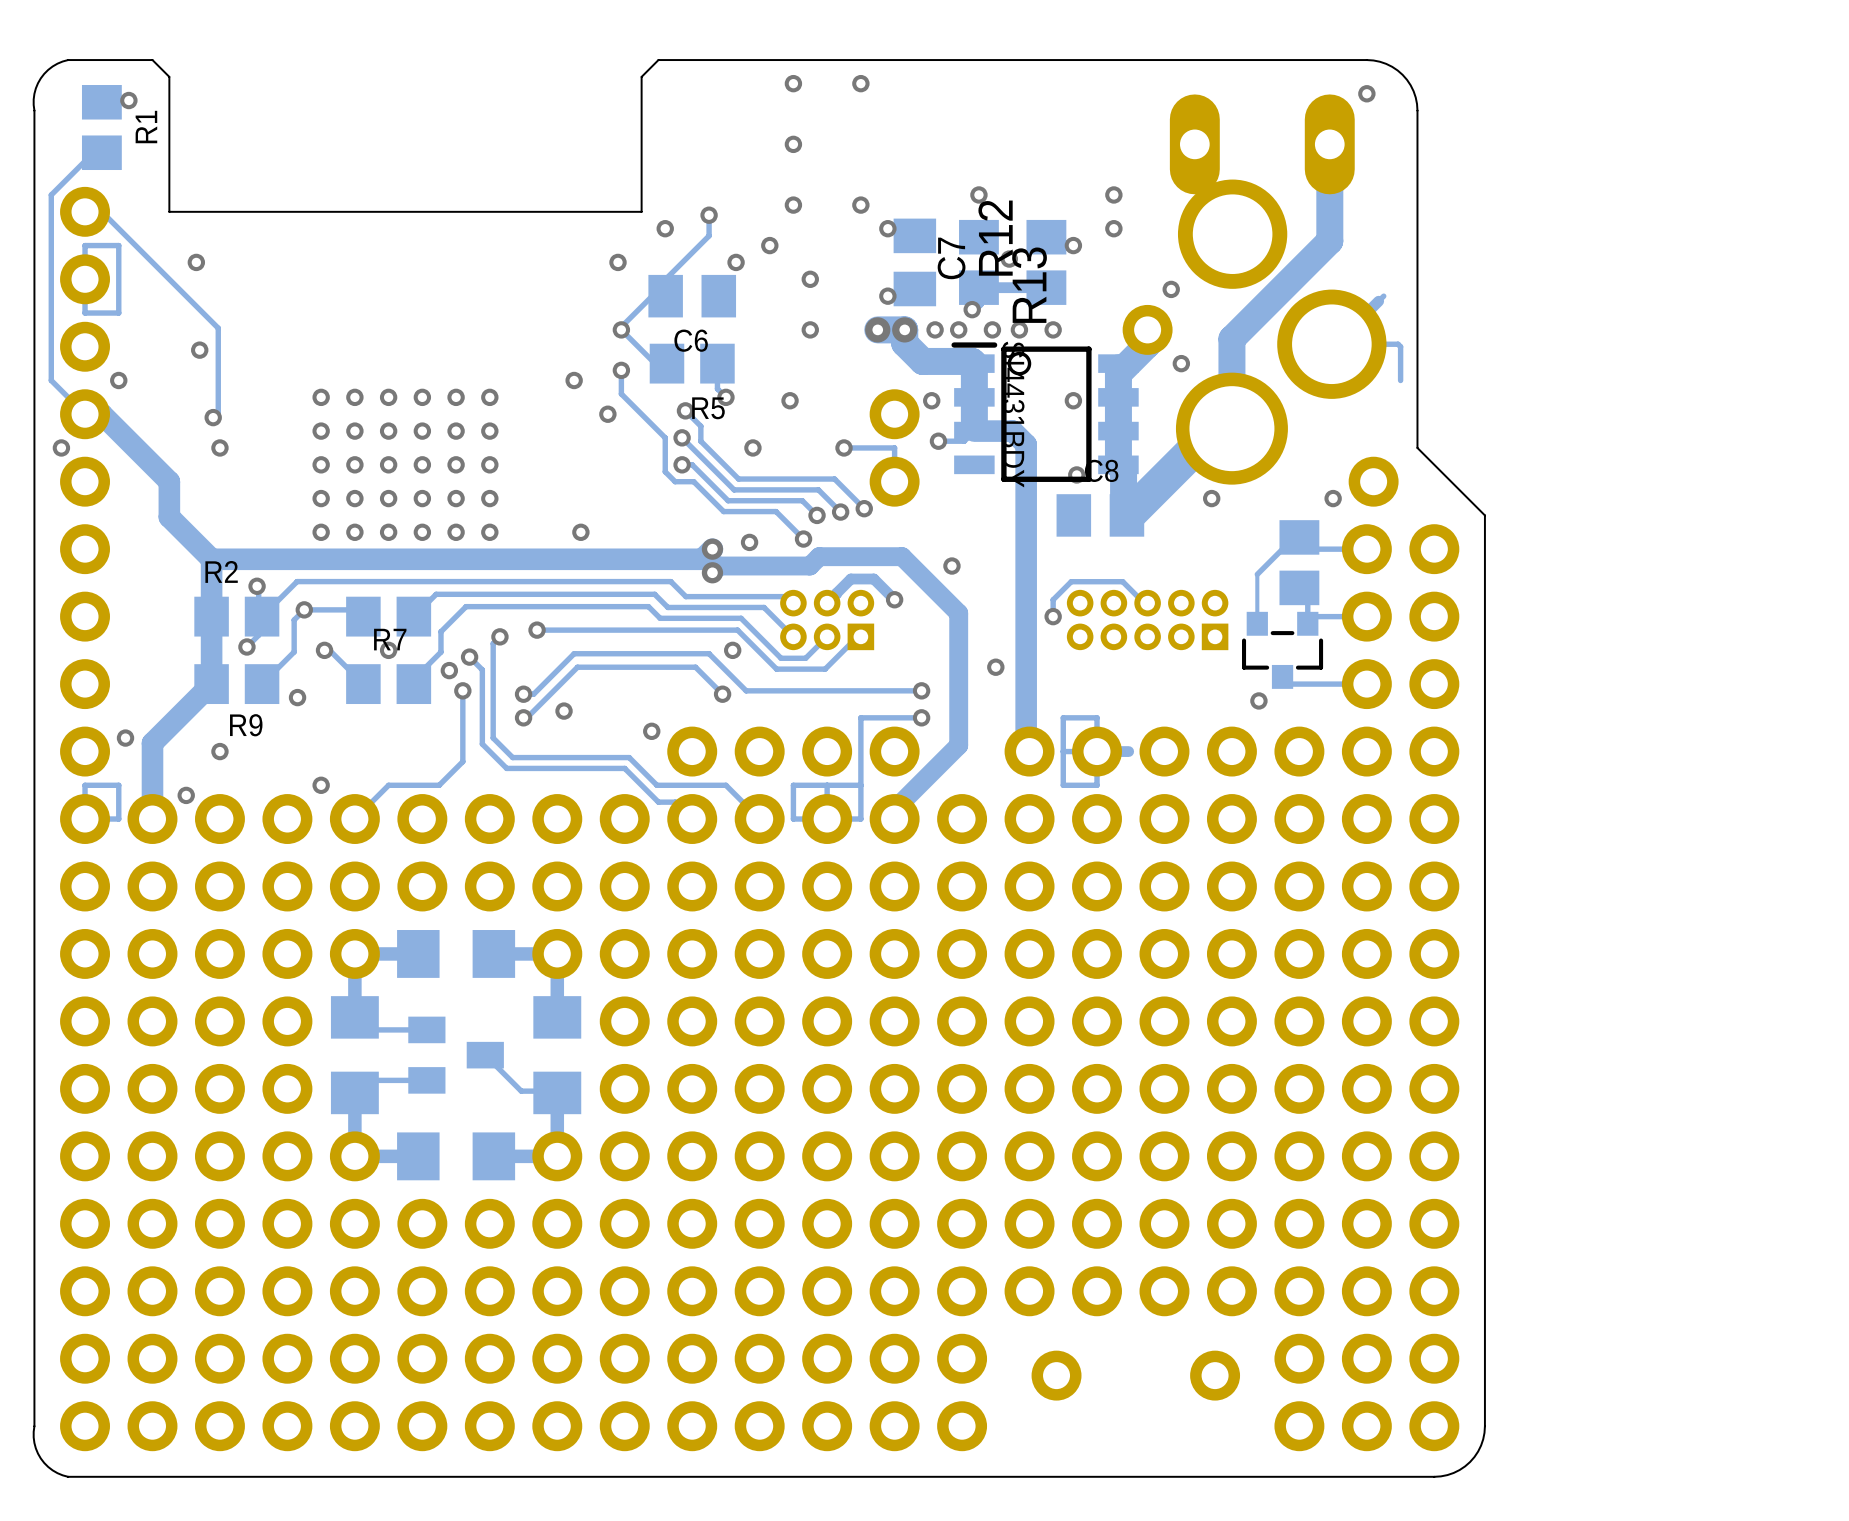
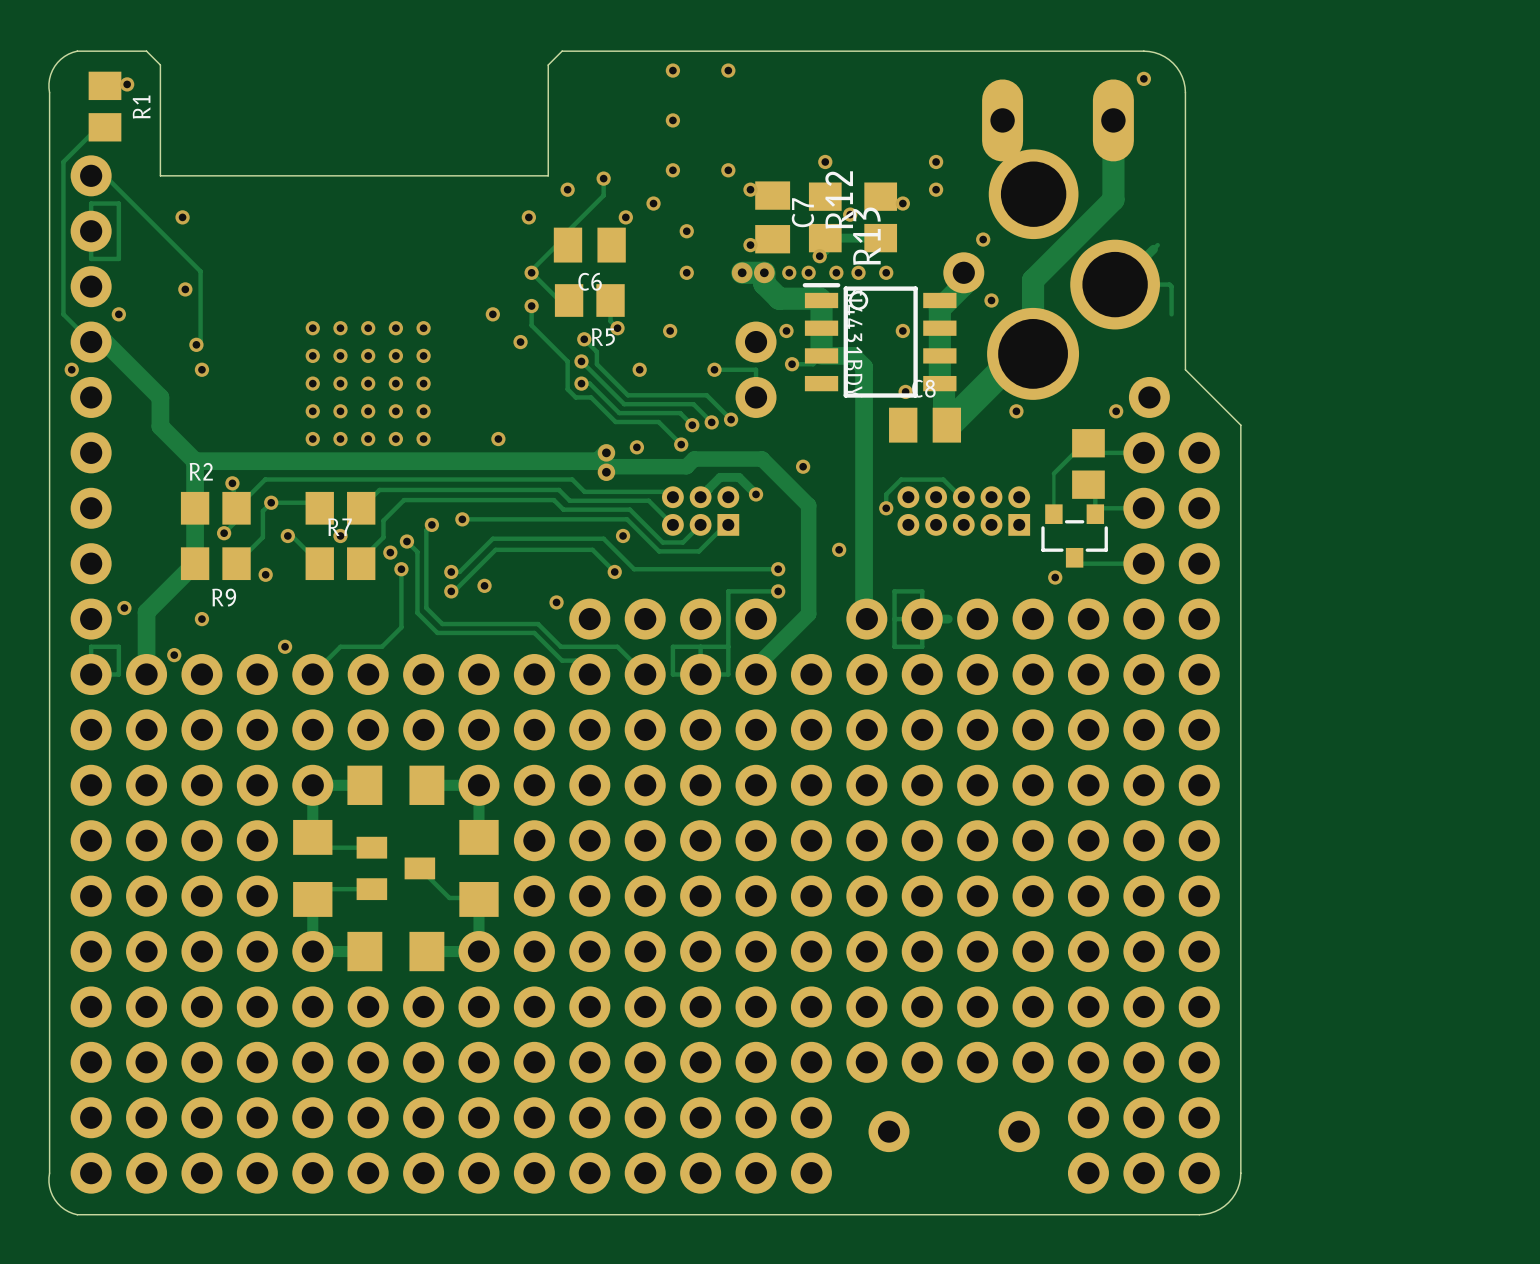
via: (321, 397) -> none
via: (321, 431) -> none
via: (321, 464) -> none
via: (321, 498) -> none
via: (321, 532) -> none

